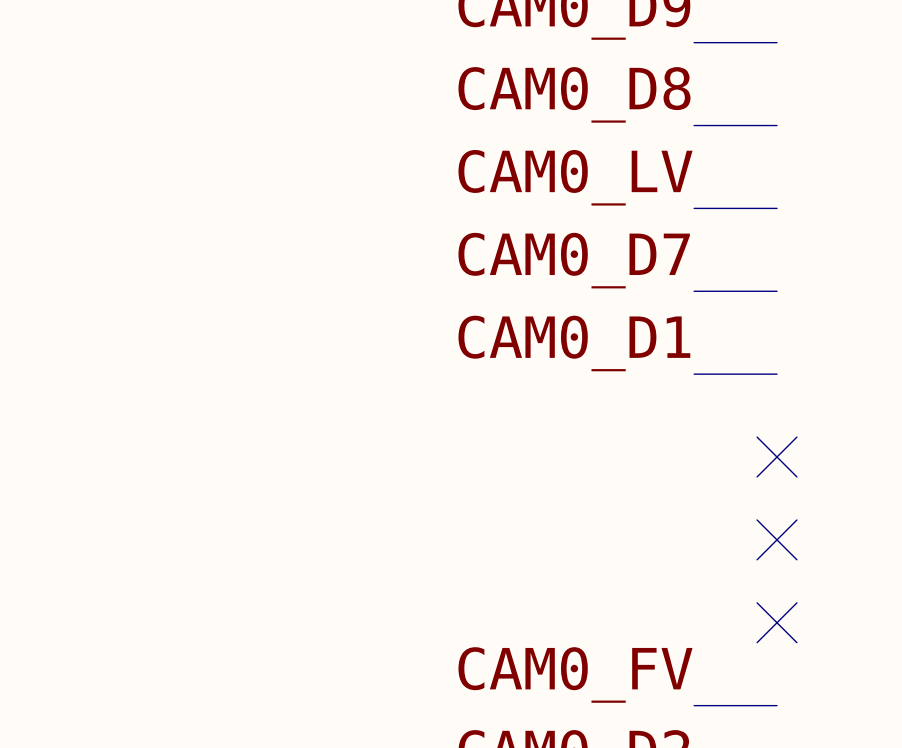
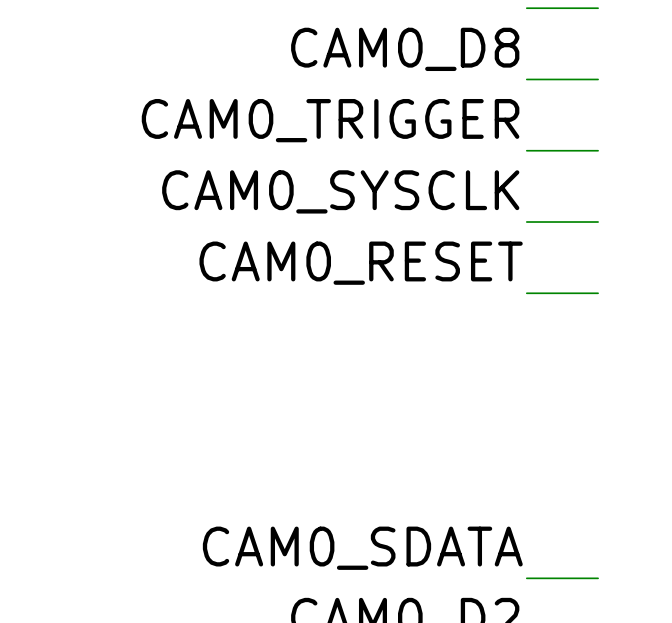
label: CAM0_LV (575, 177) -> CAM0_TRIGGER (330, 120)
label: CAM0_D7 (574, 260) -> CAM0_SYSCLK (340, 191)
label: CAM0_D1 (574, 343) -> CAM0_RESET (361, 263)
no-connect mark: (777, 457) -> none
no-connect mark: (777, 539) -> none
no-connect mark: (777, 622) -> none
label: CAM0_FV (575, 674) -> CAM0_SDATA (362, 548)

